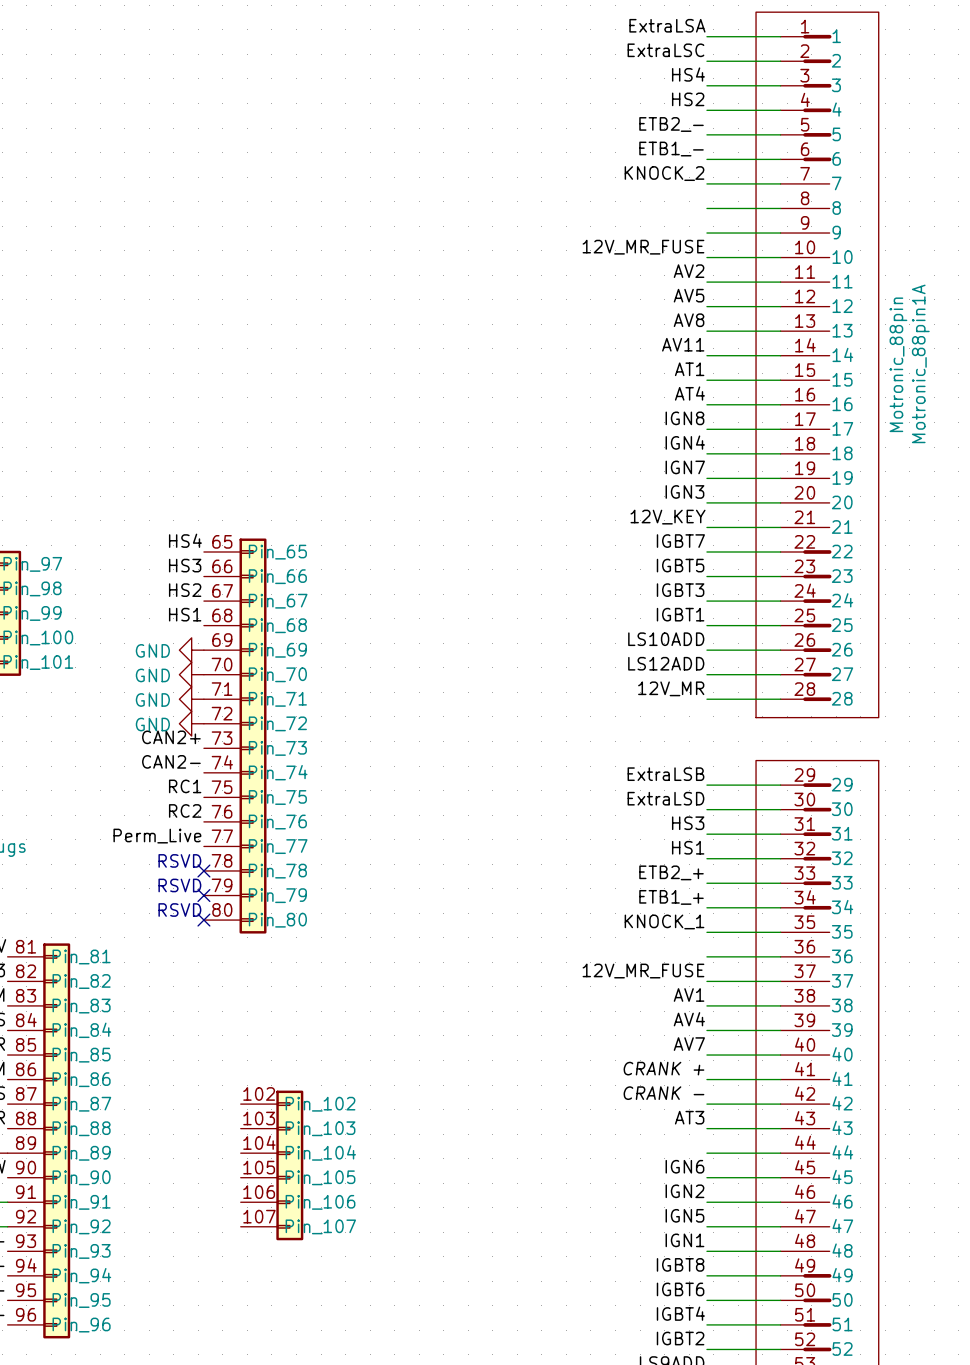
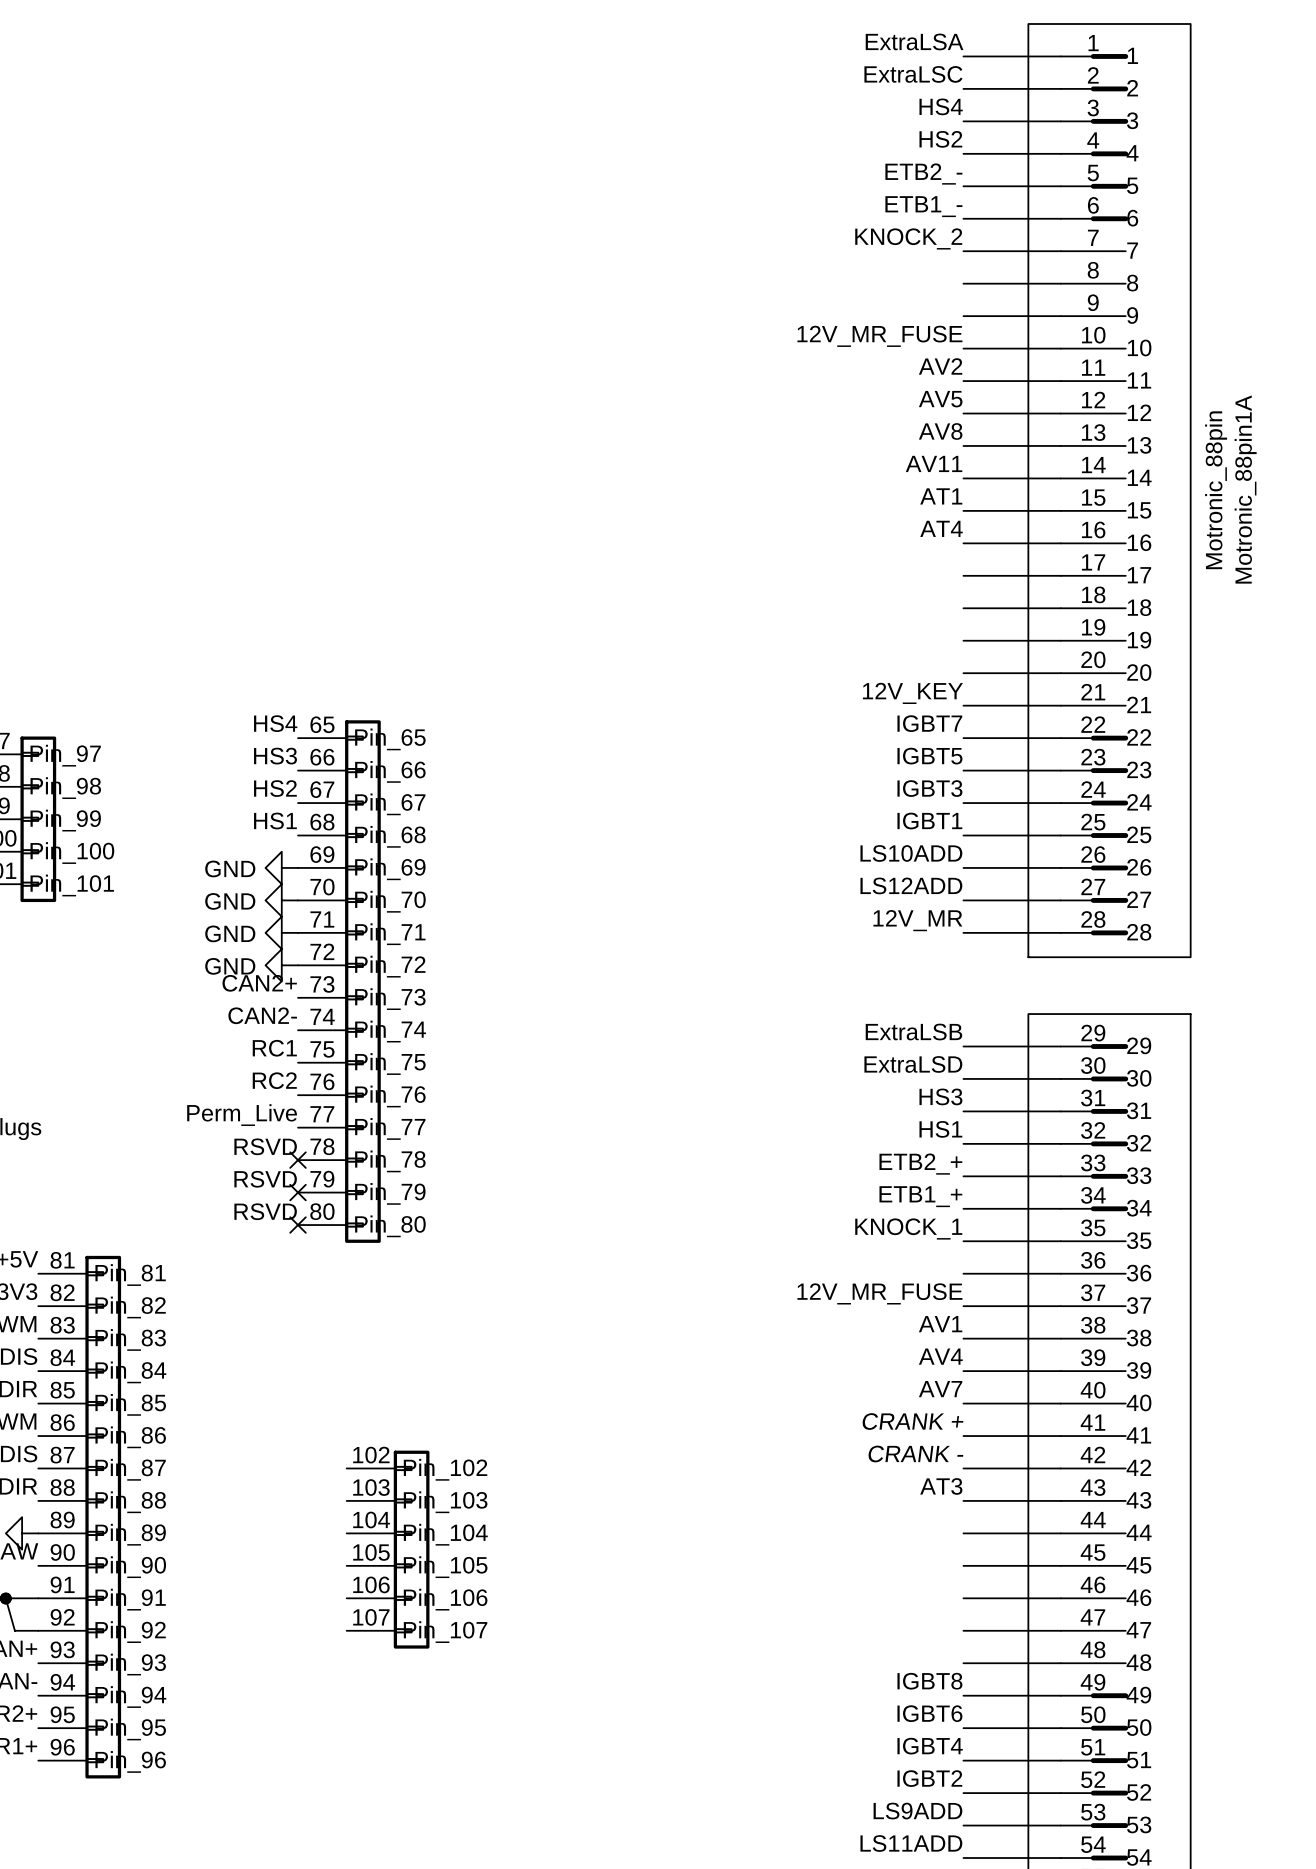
label: IGN8 (684, 418) -> none
label: IGN4 (685, 442) -> none
label: IGN7 (685, 467) -> none
label: IGN3 (684, 491) -> none
label: IGN6 (684, 1166) -> none
label: IGN2 (684, 1191) -> none
label: IGN5 (684, 1215) -> none
label: IGN1 (684, 1240) -> none

